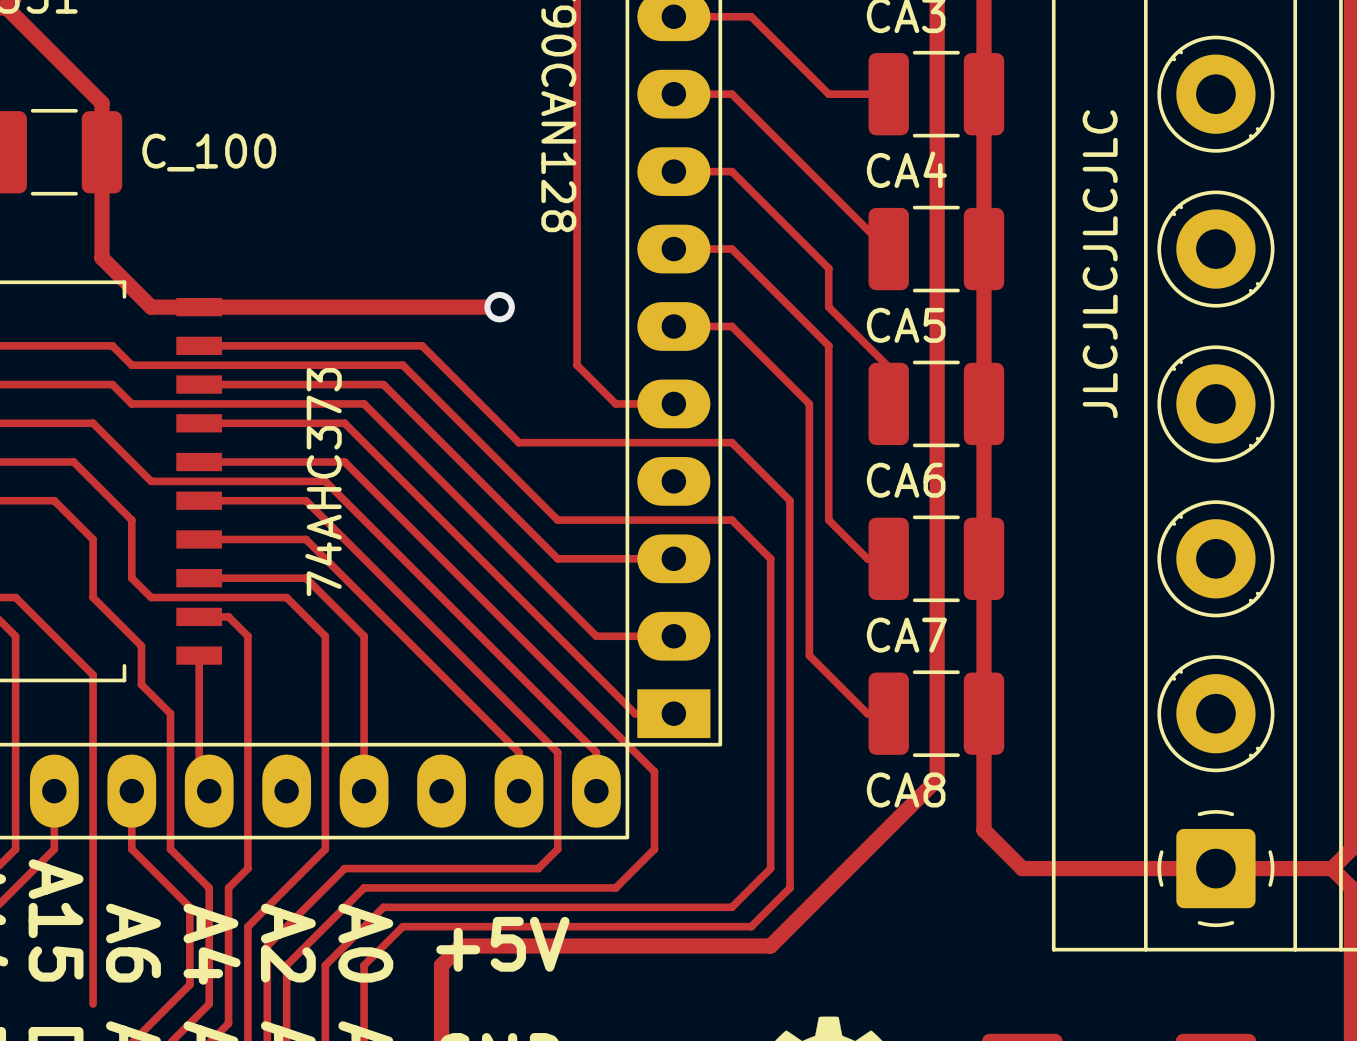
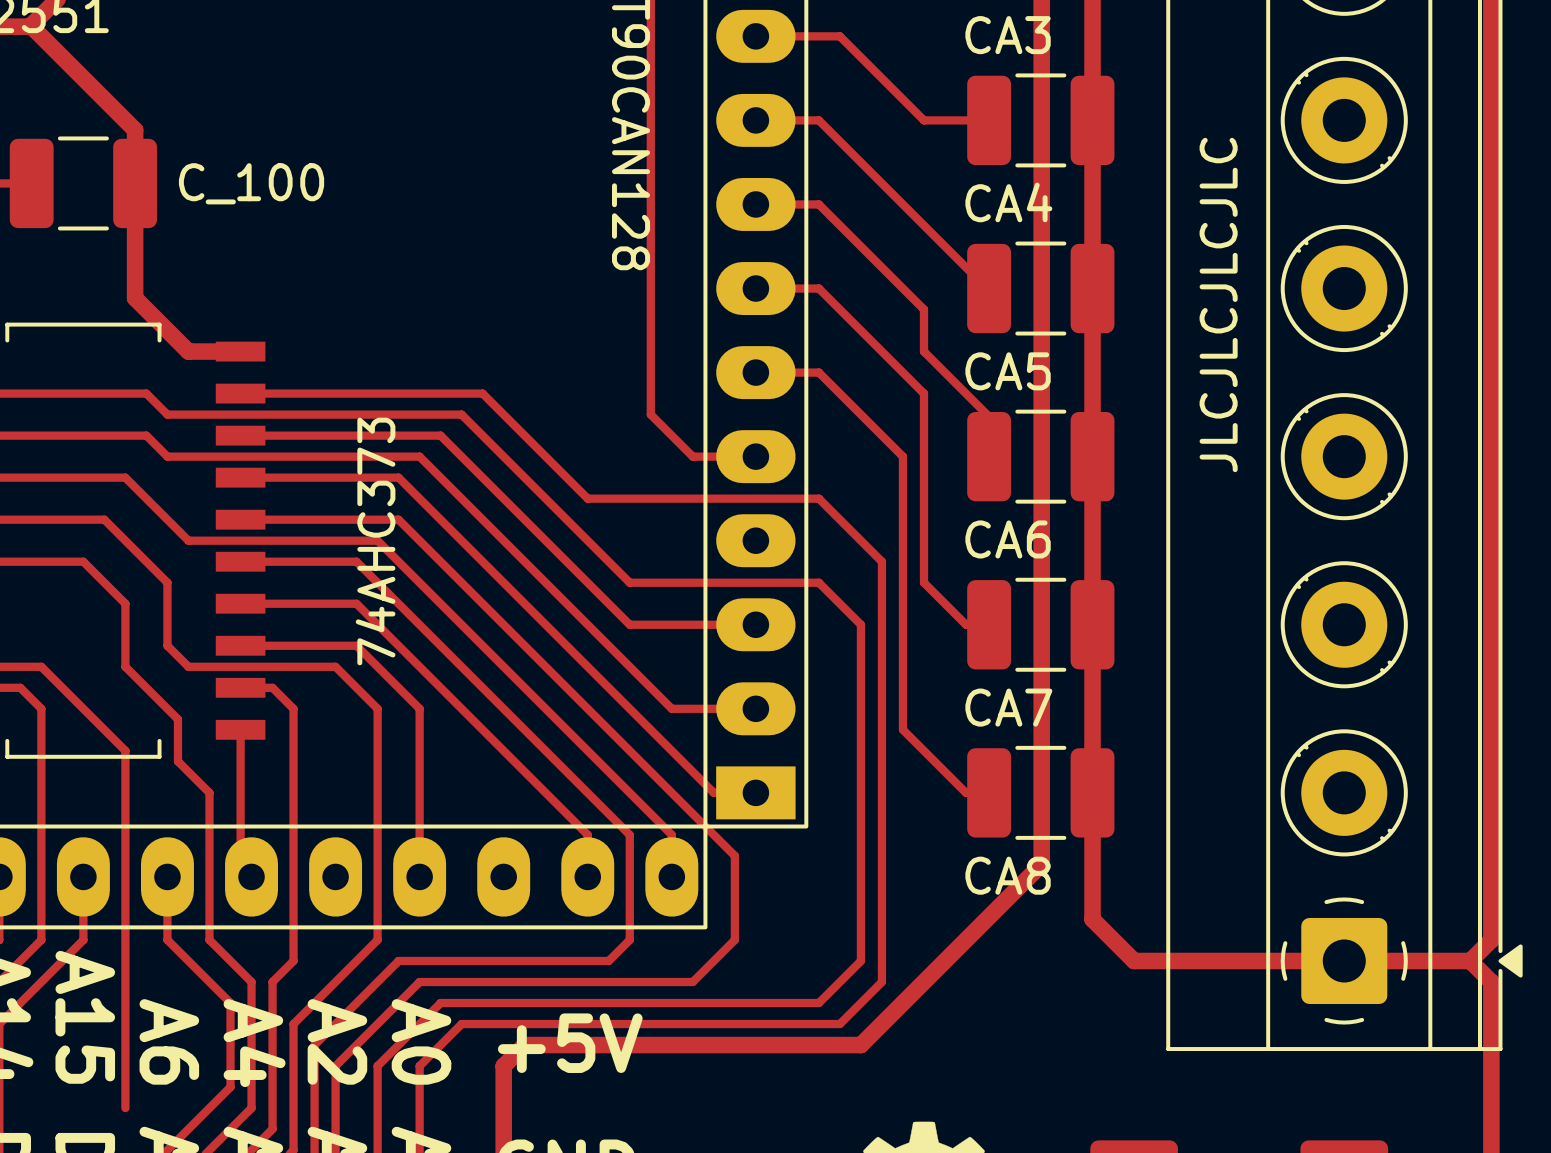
track: (199, 307) (499, 307) -> none
via: (499, 307) -> none

